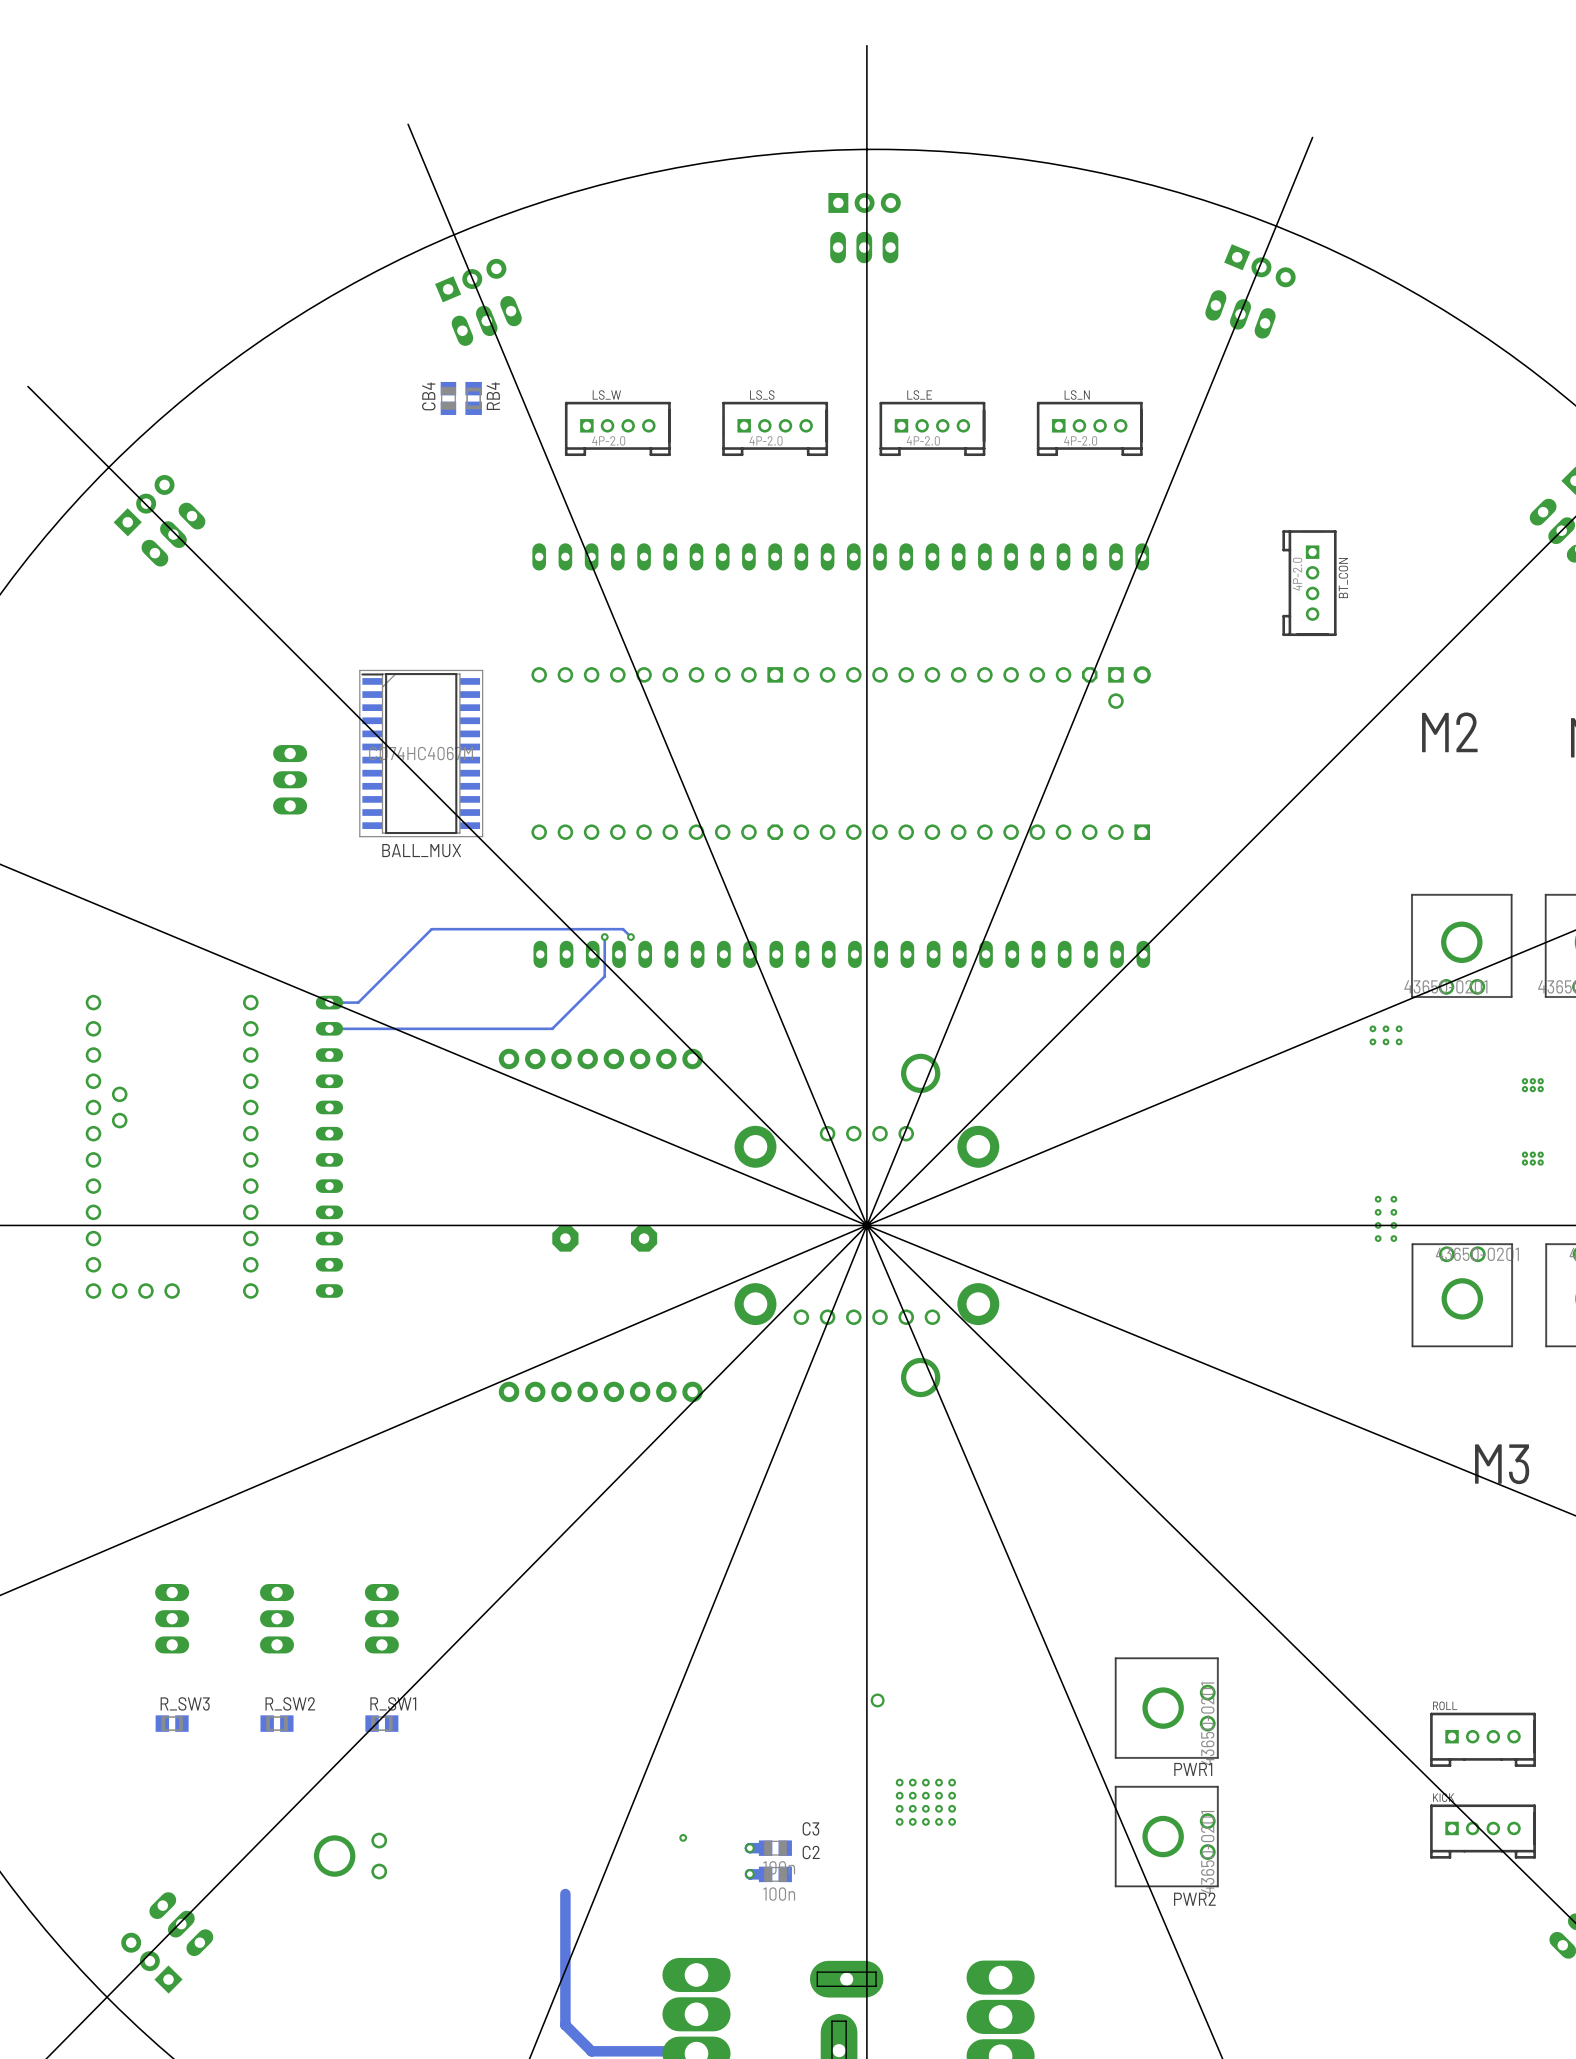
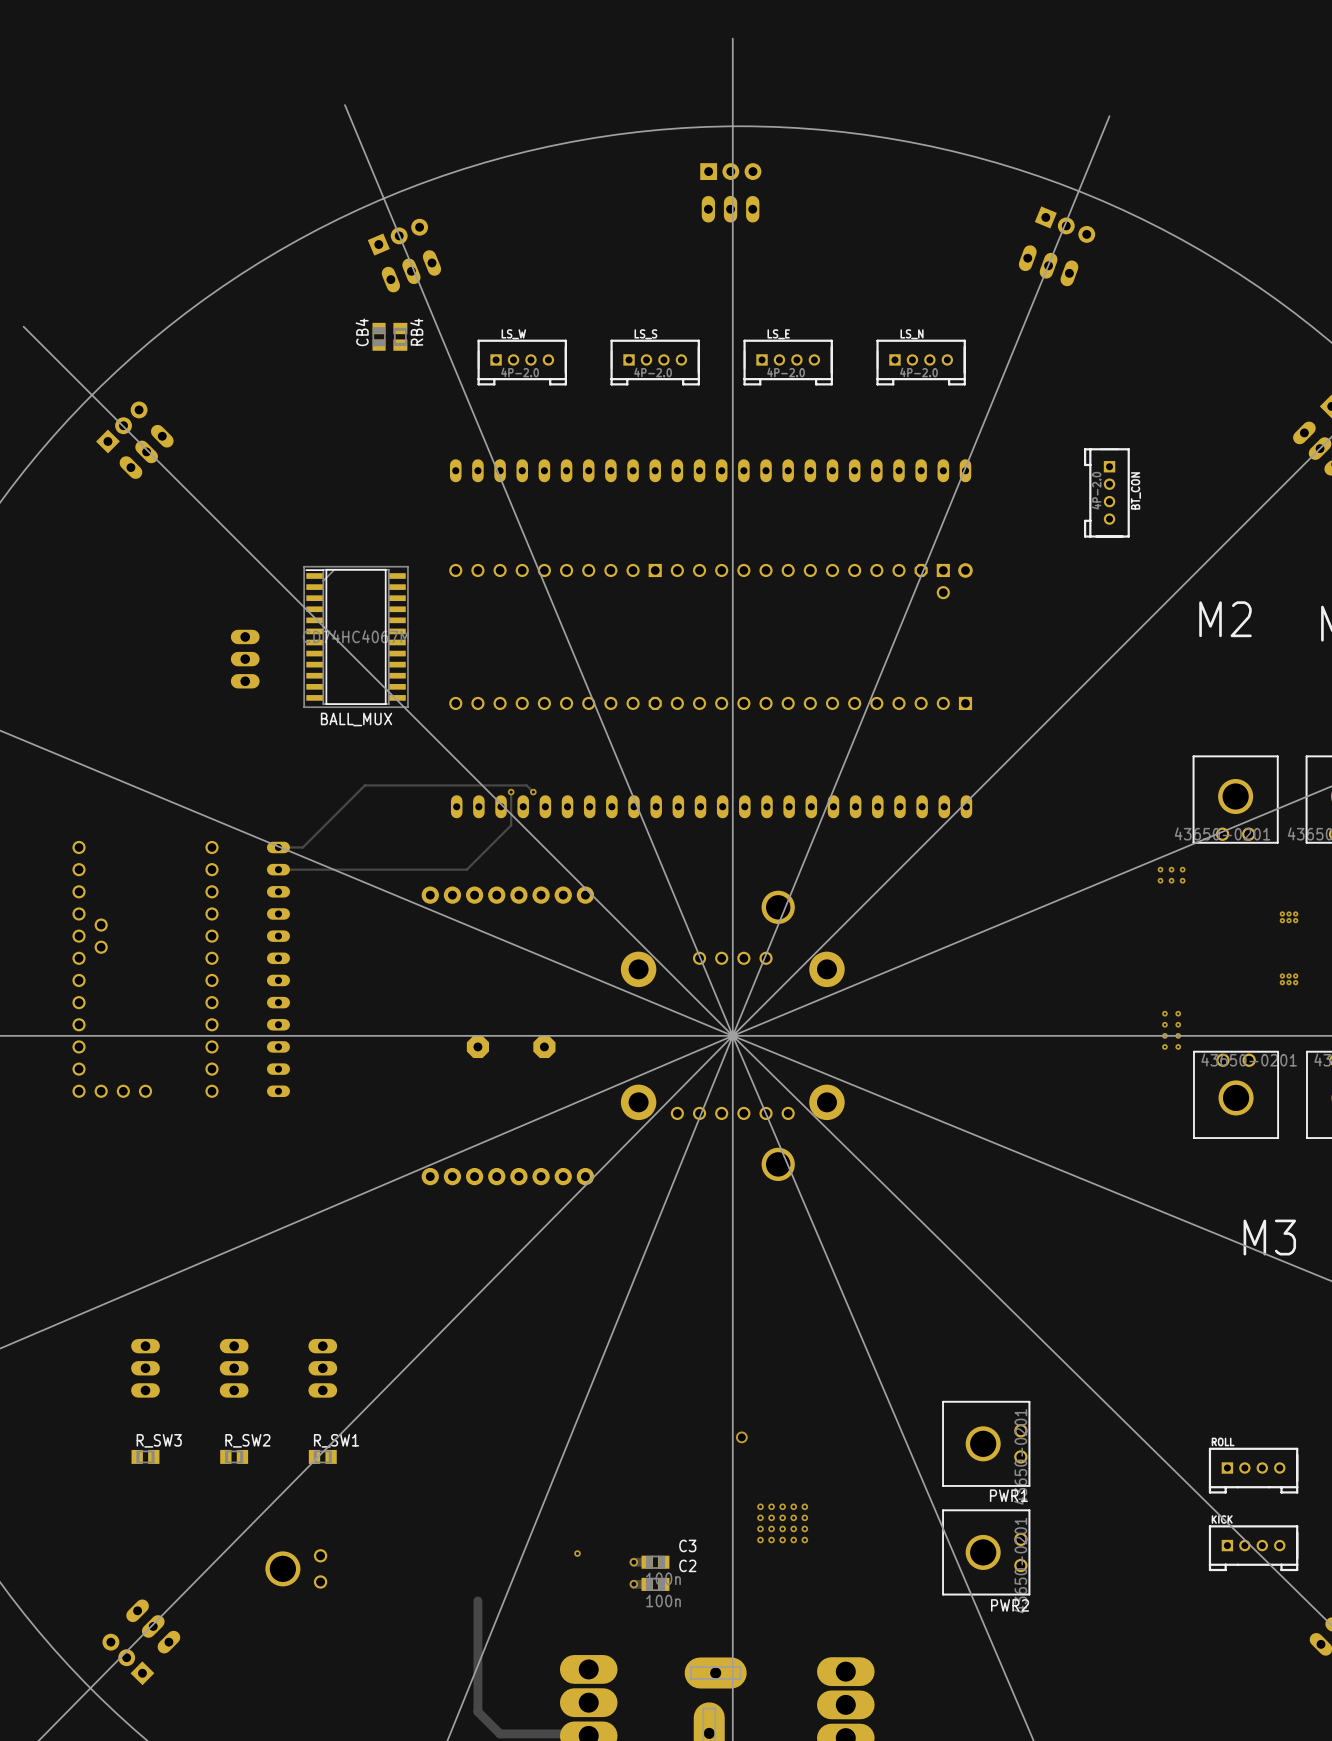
via: none -> (1282, 913)
via: (1540, 1081) -> none
via: none -> (1282, 920)
via: (1540, 1089) -> none
via: none -> (1282, 976)
via: (1540, 1154) -> none
via: none -> (1282, 982)
via: (1540, 1162) -> none

